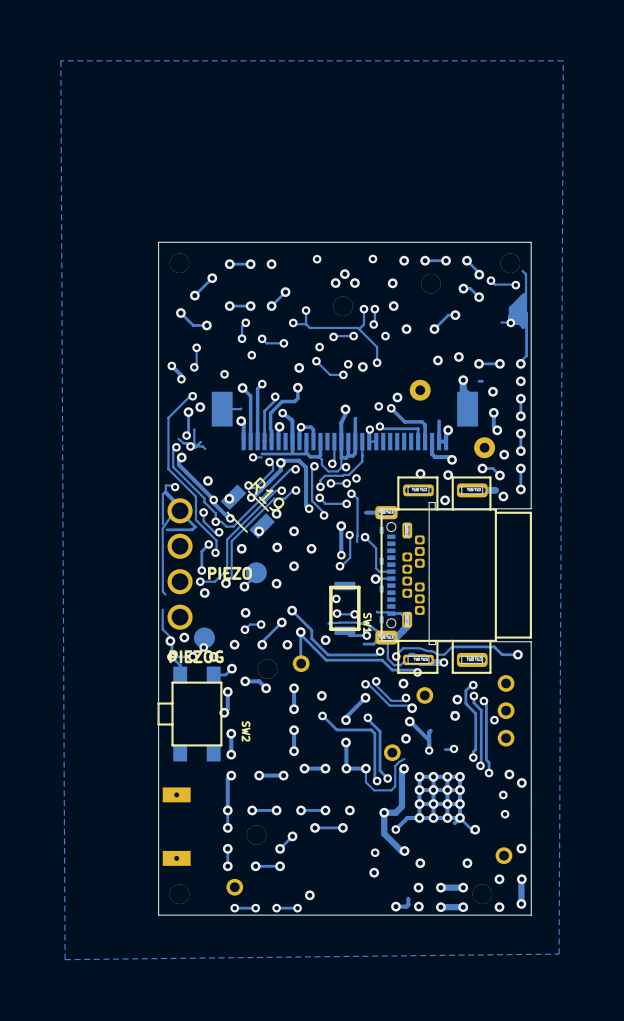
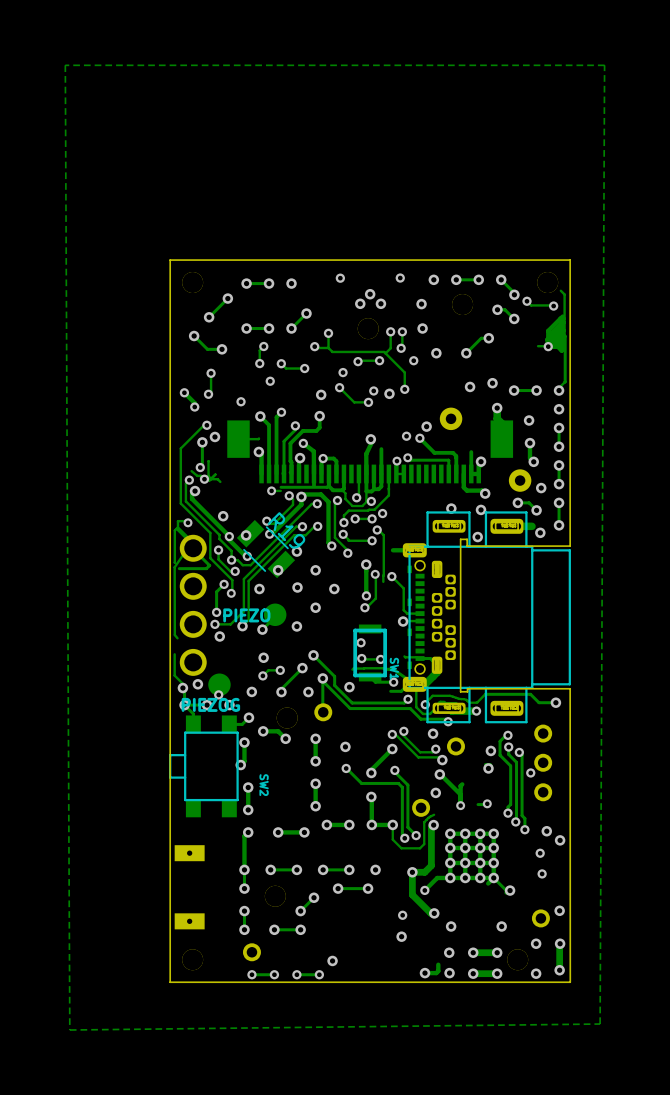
track: (482, 381) (478, 381) -> none

